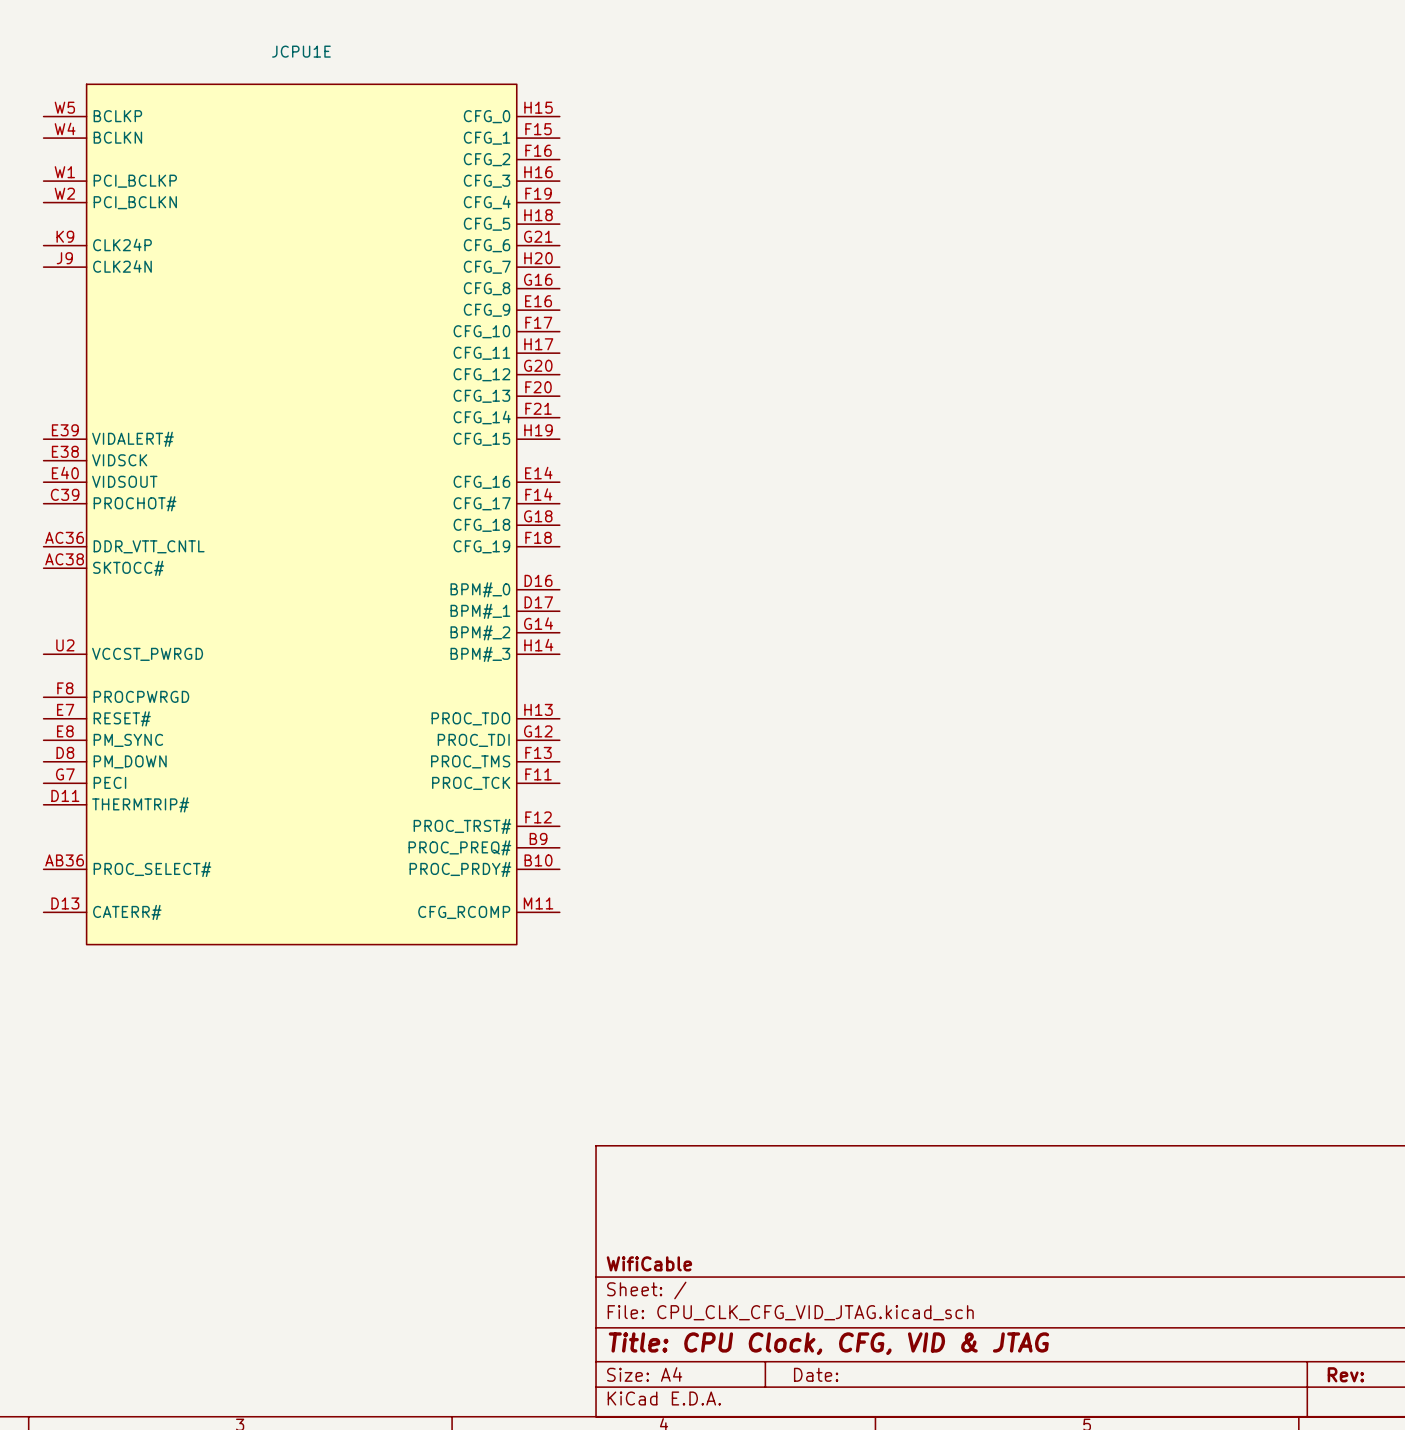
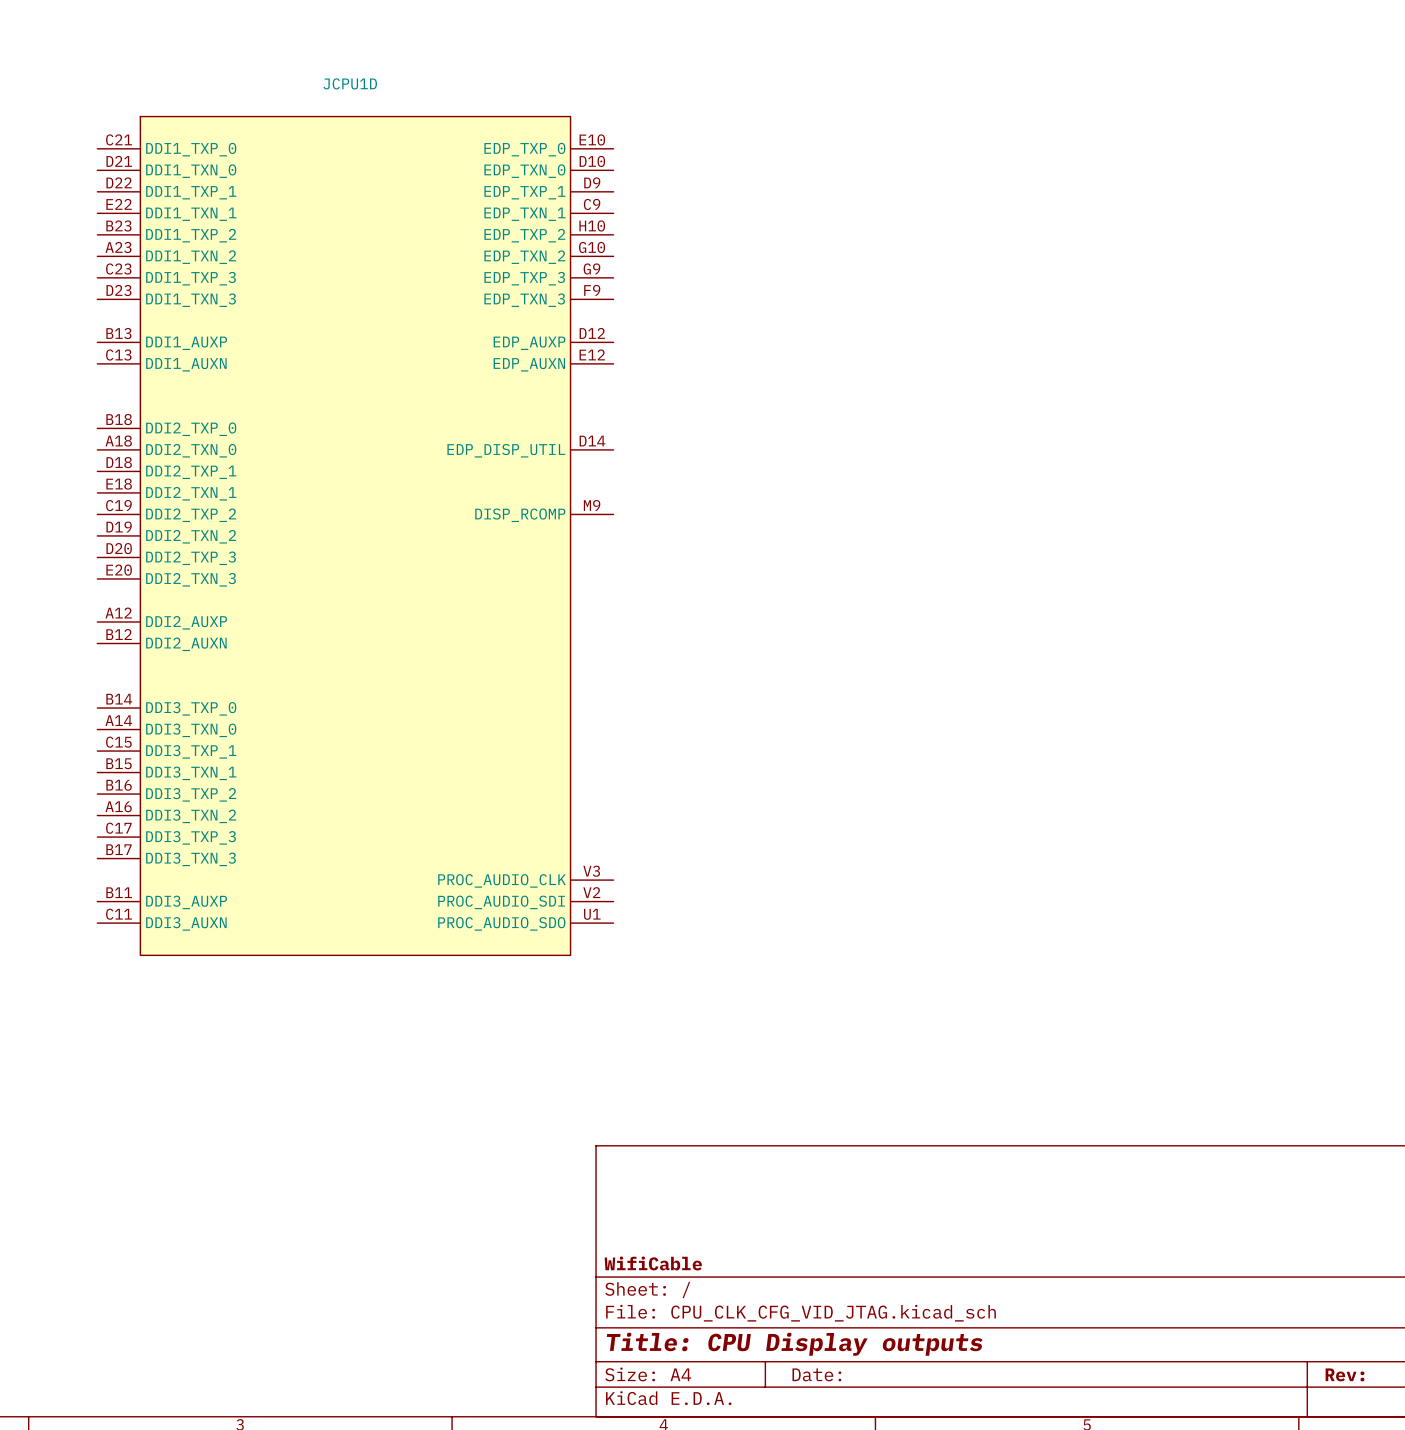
JCPU1E: (301, 514) -> none
JCPU1D: none -> (355, 535)
title block: Title: CPU Clock, CFG, VID & JTAG (828, 1343) -> Title: CPU Display outputs (794, 1344)

